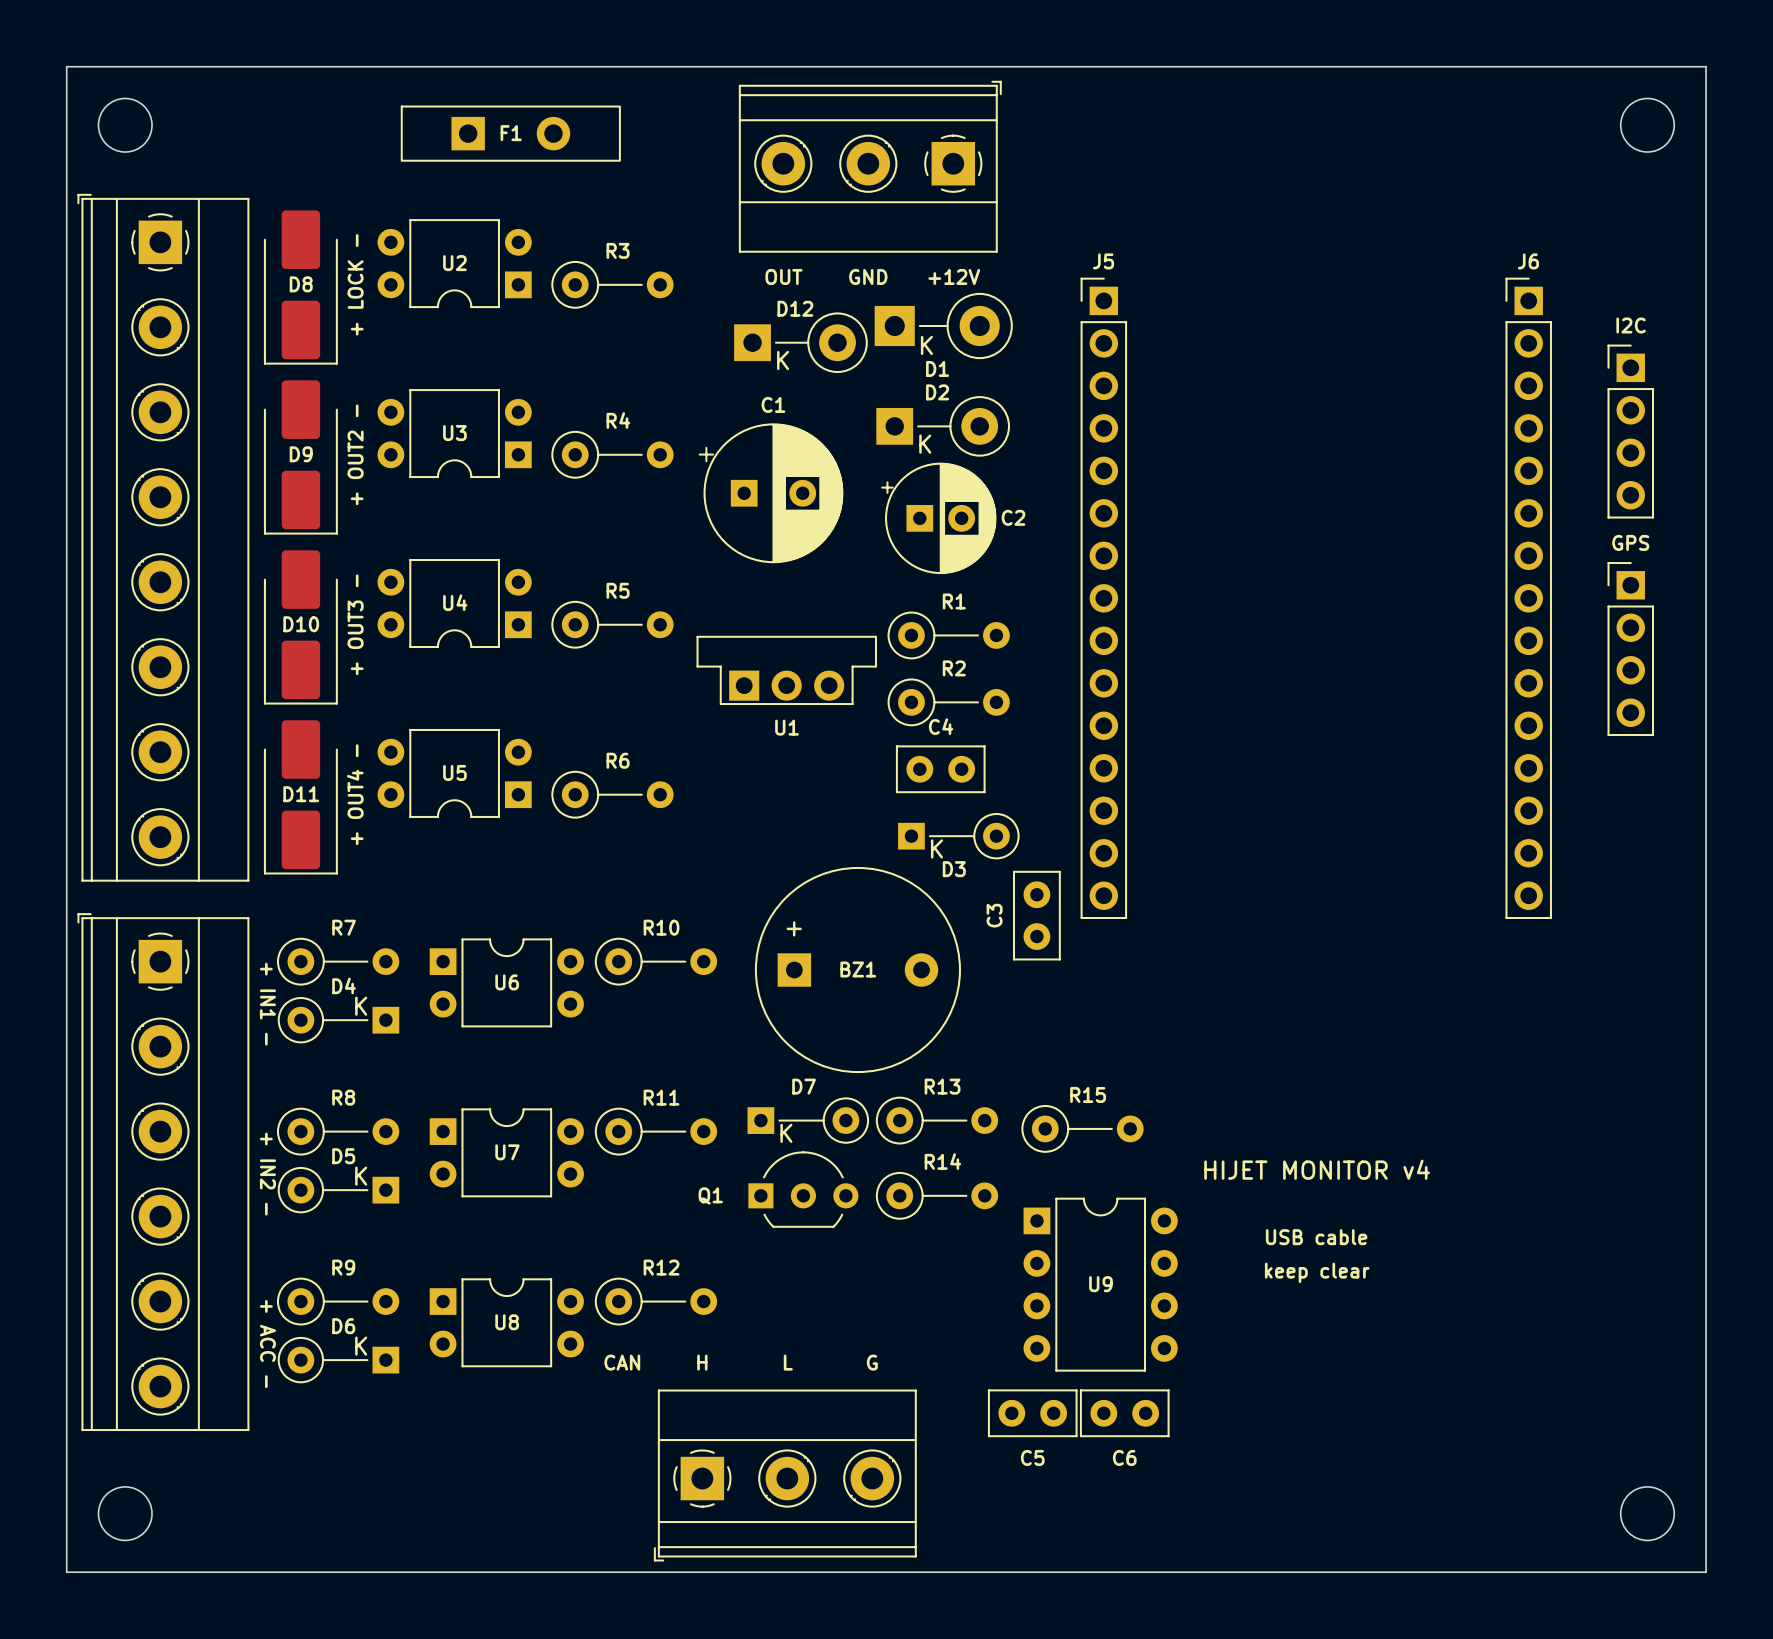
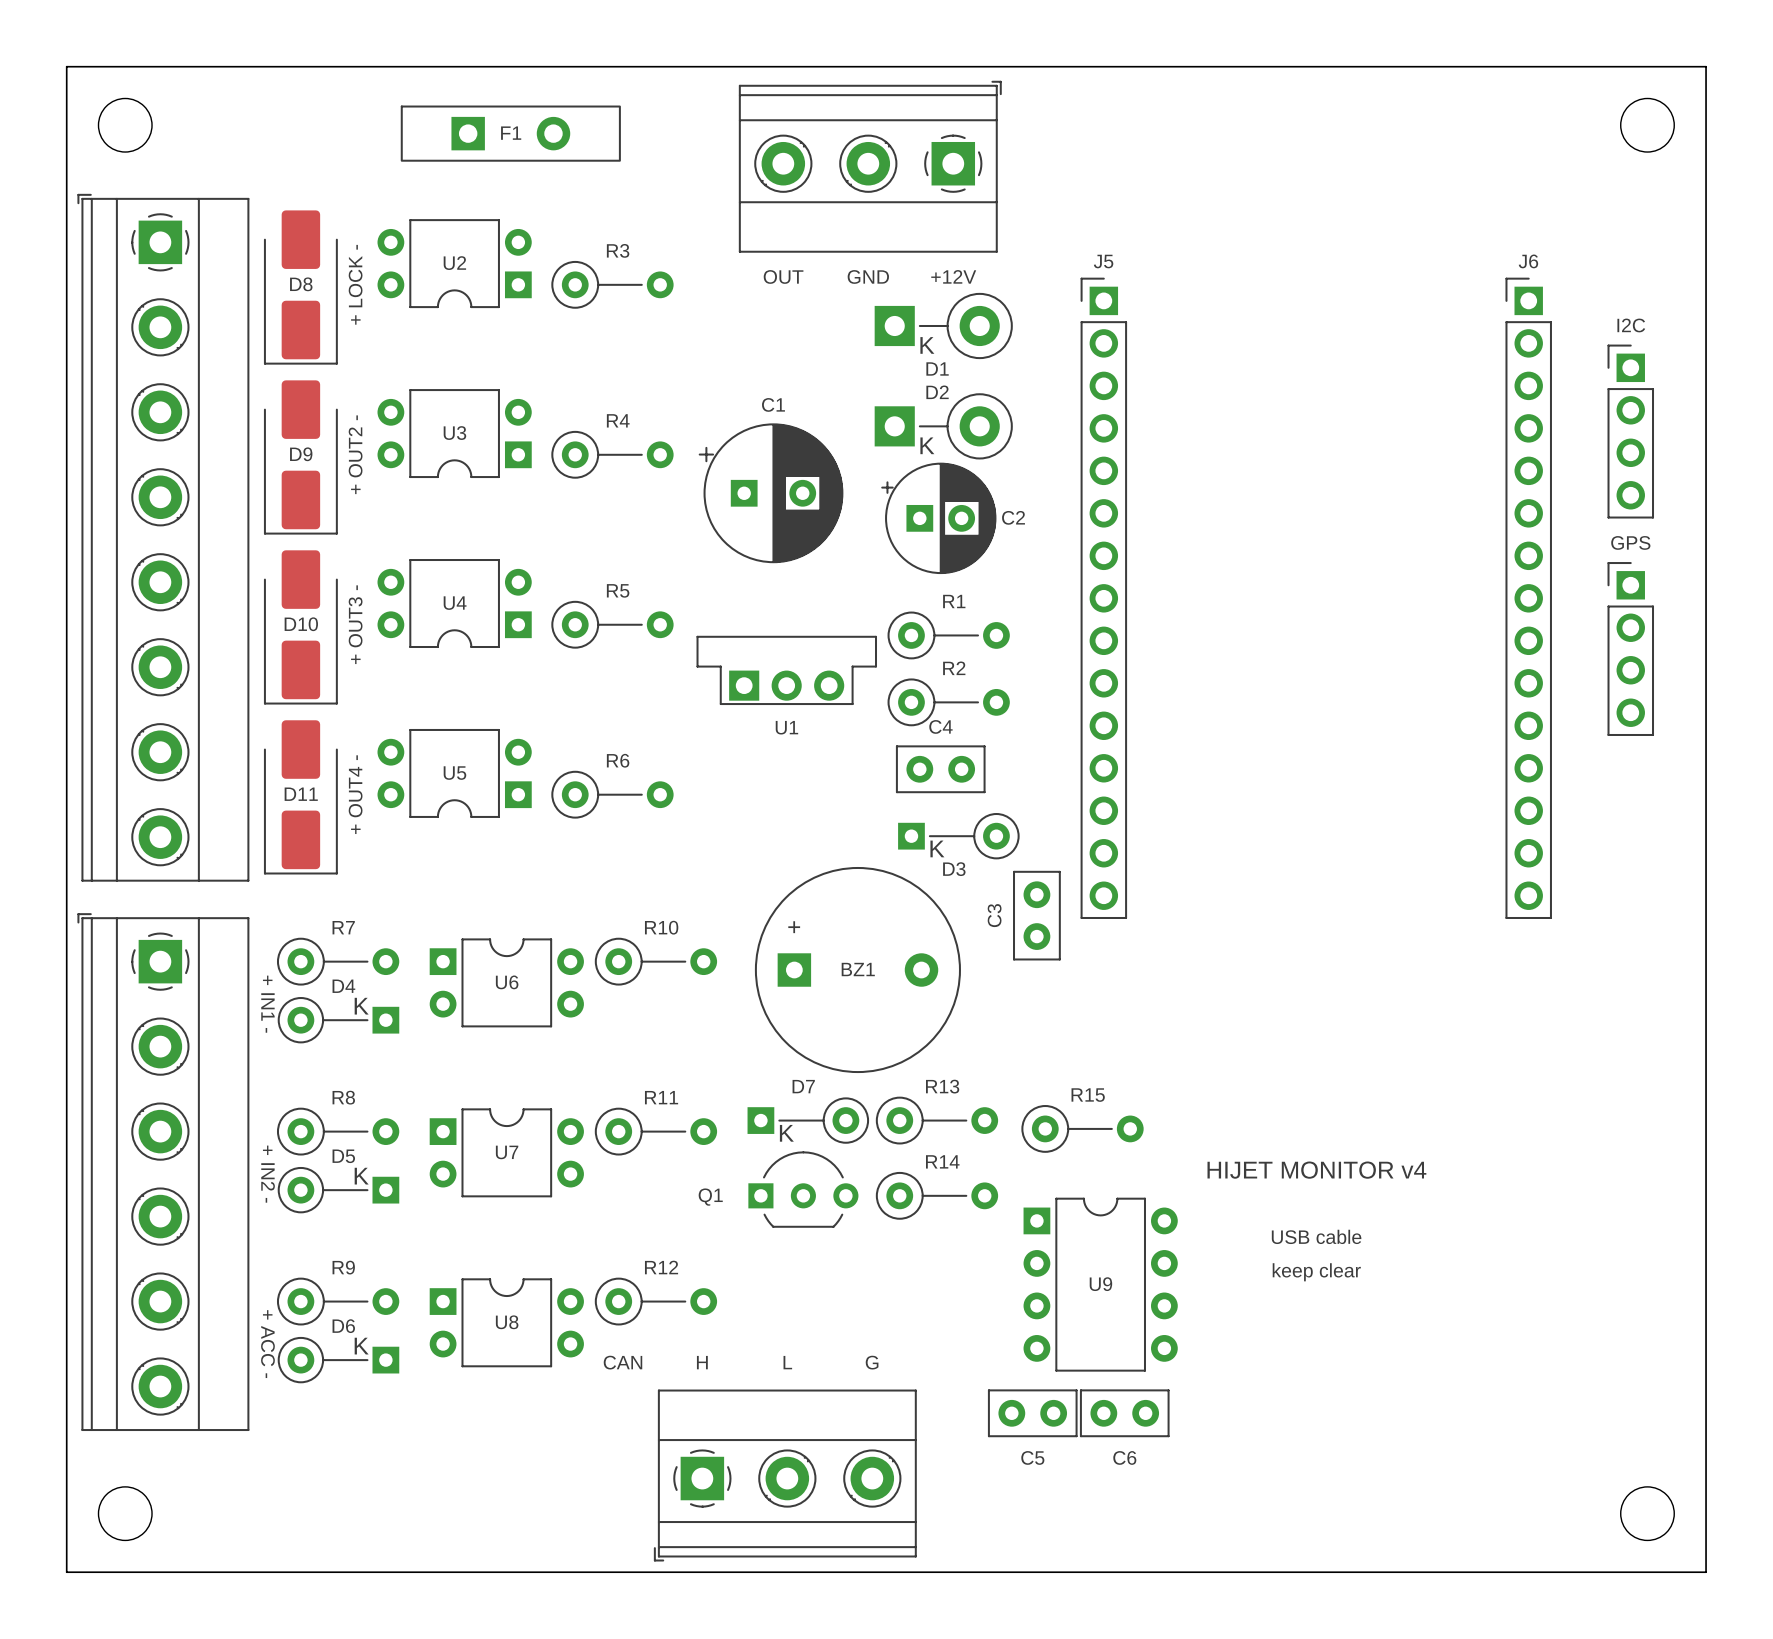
D12: (800, 342) -> none
D2 footprint: [876, 396, 1011, 457] -> [874, 393, 1013, 460]

